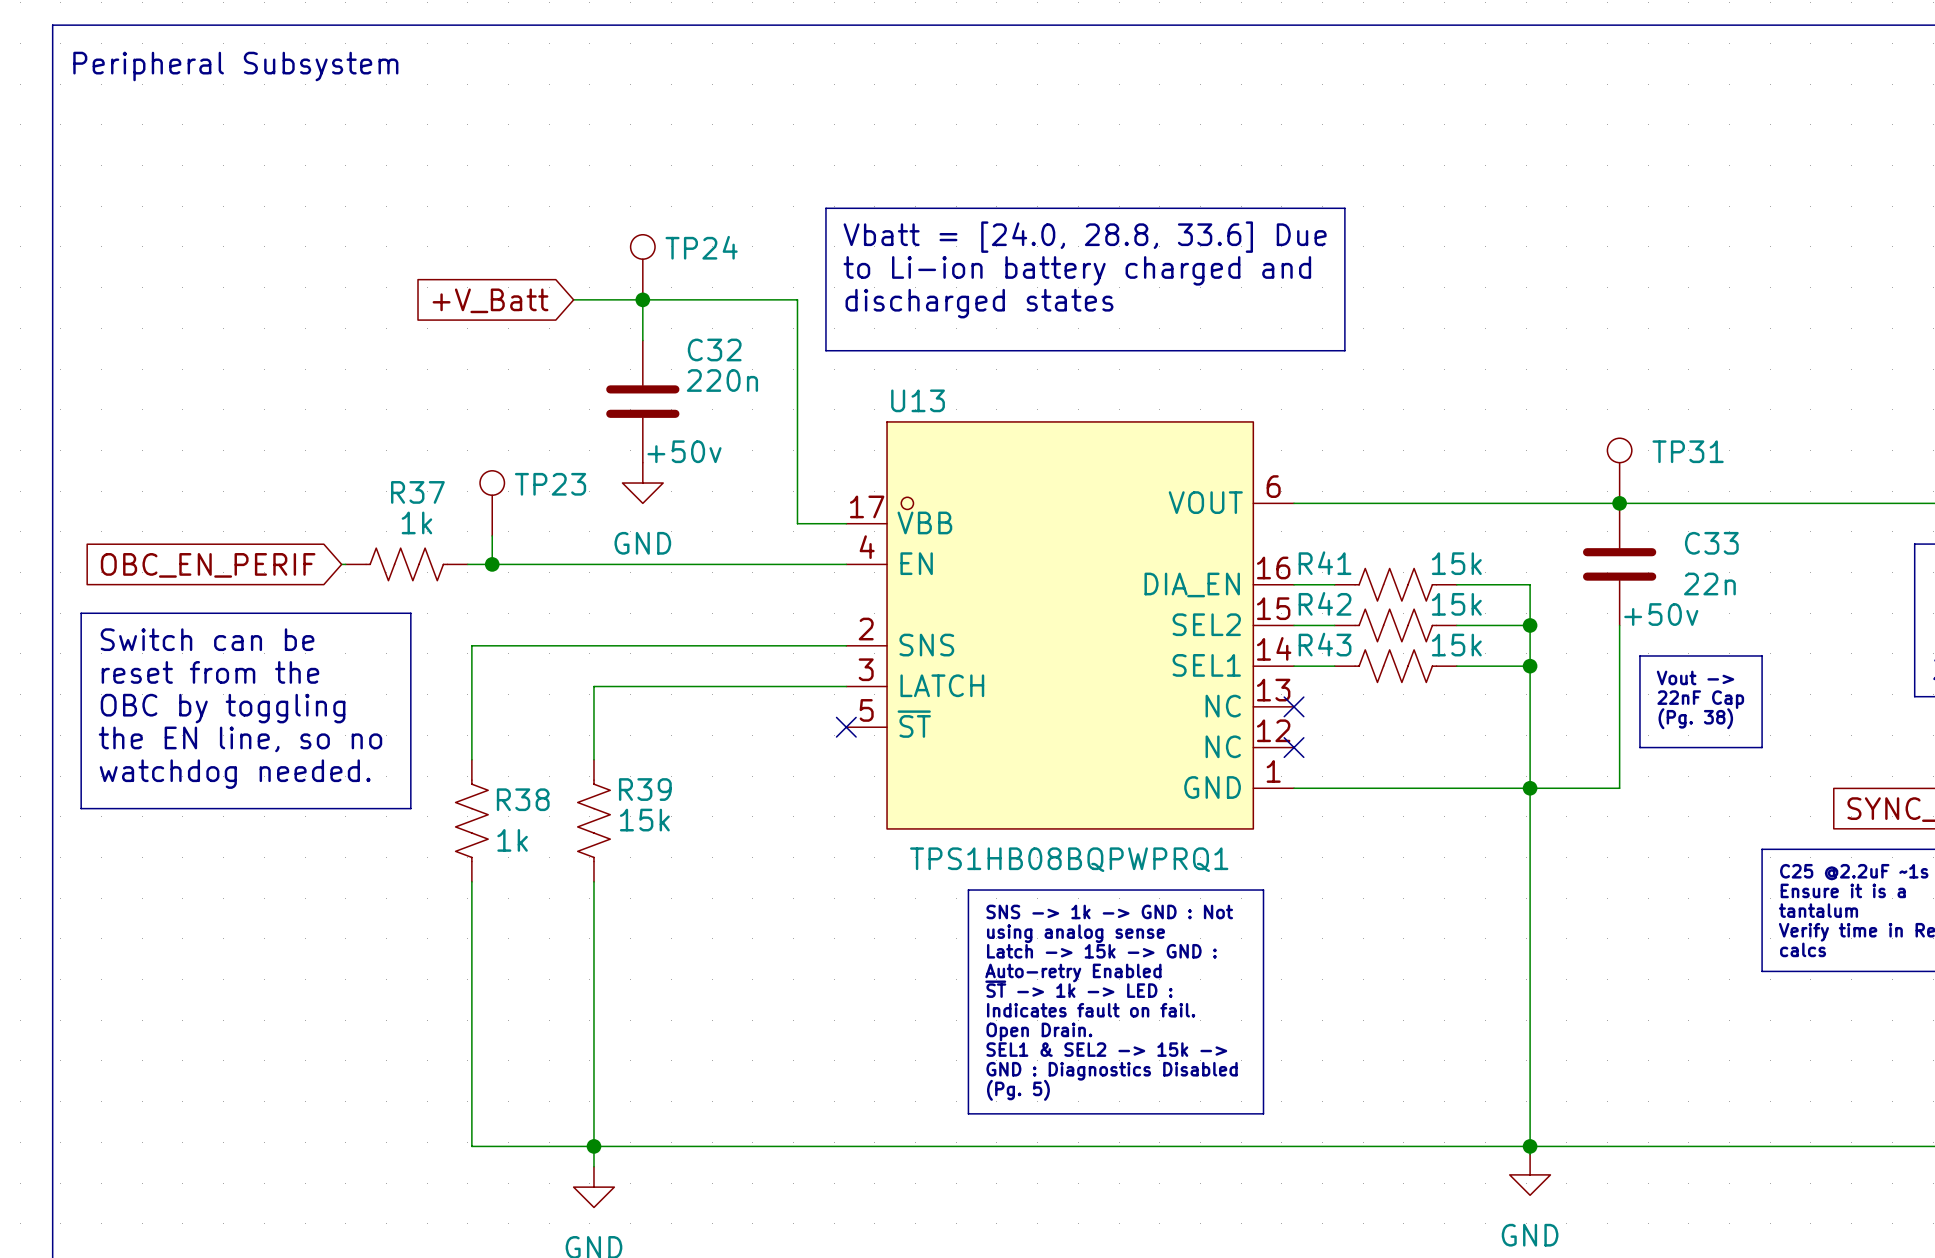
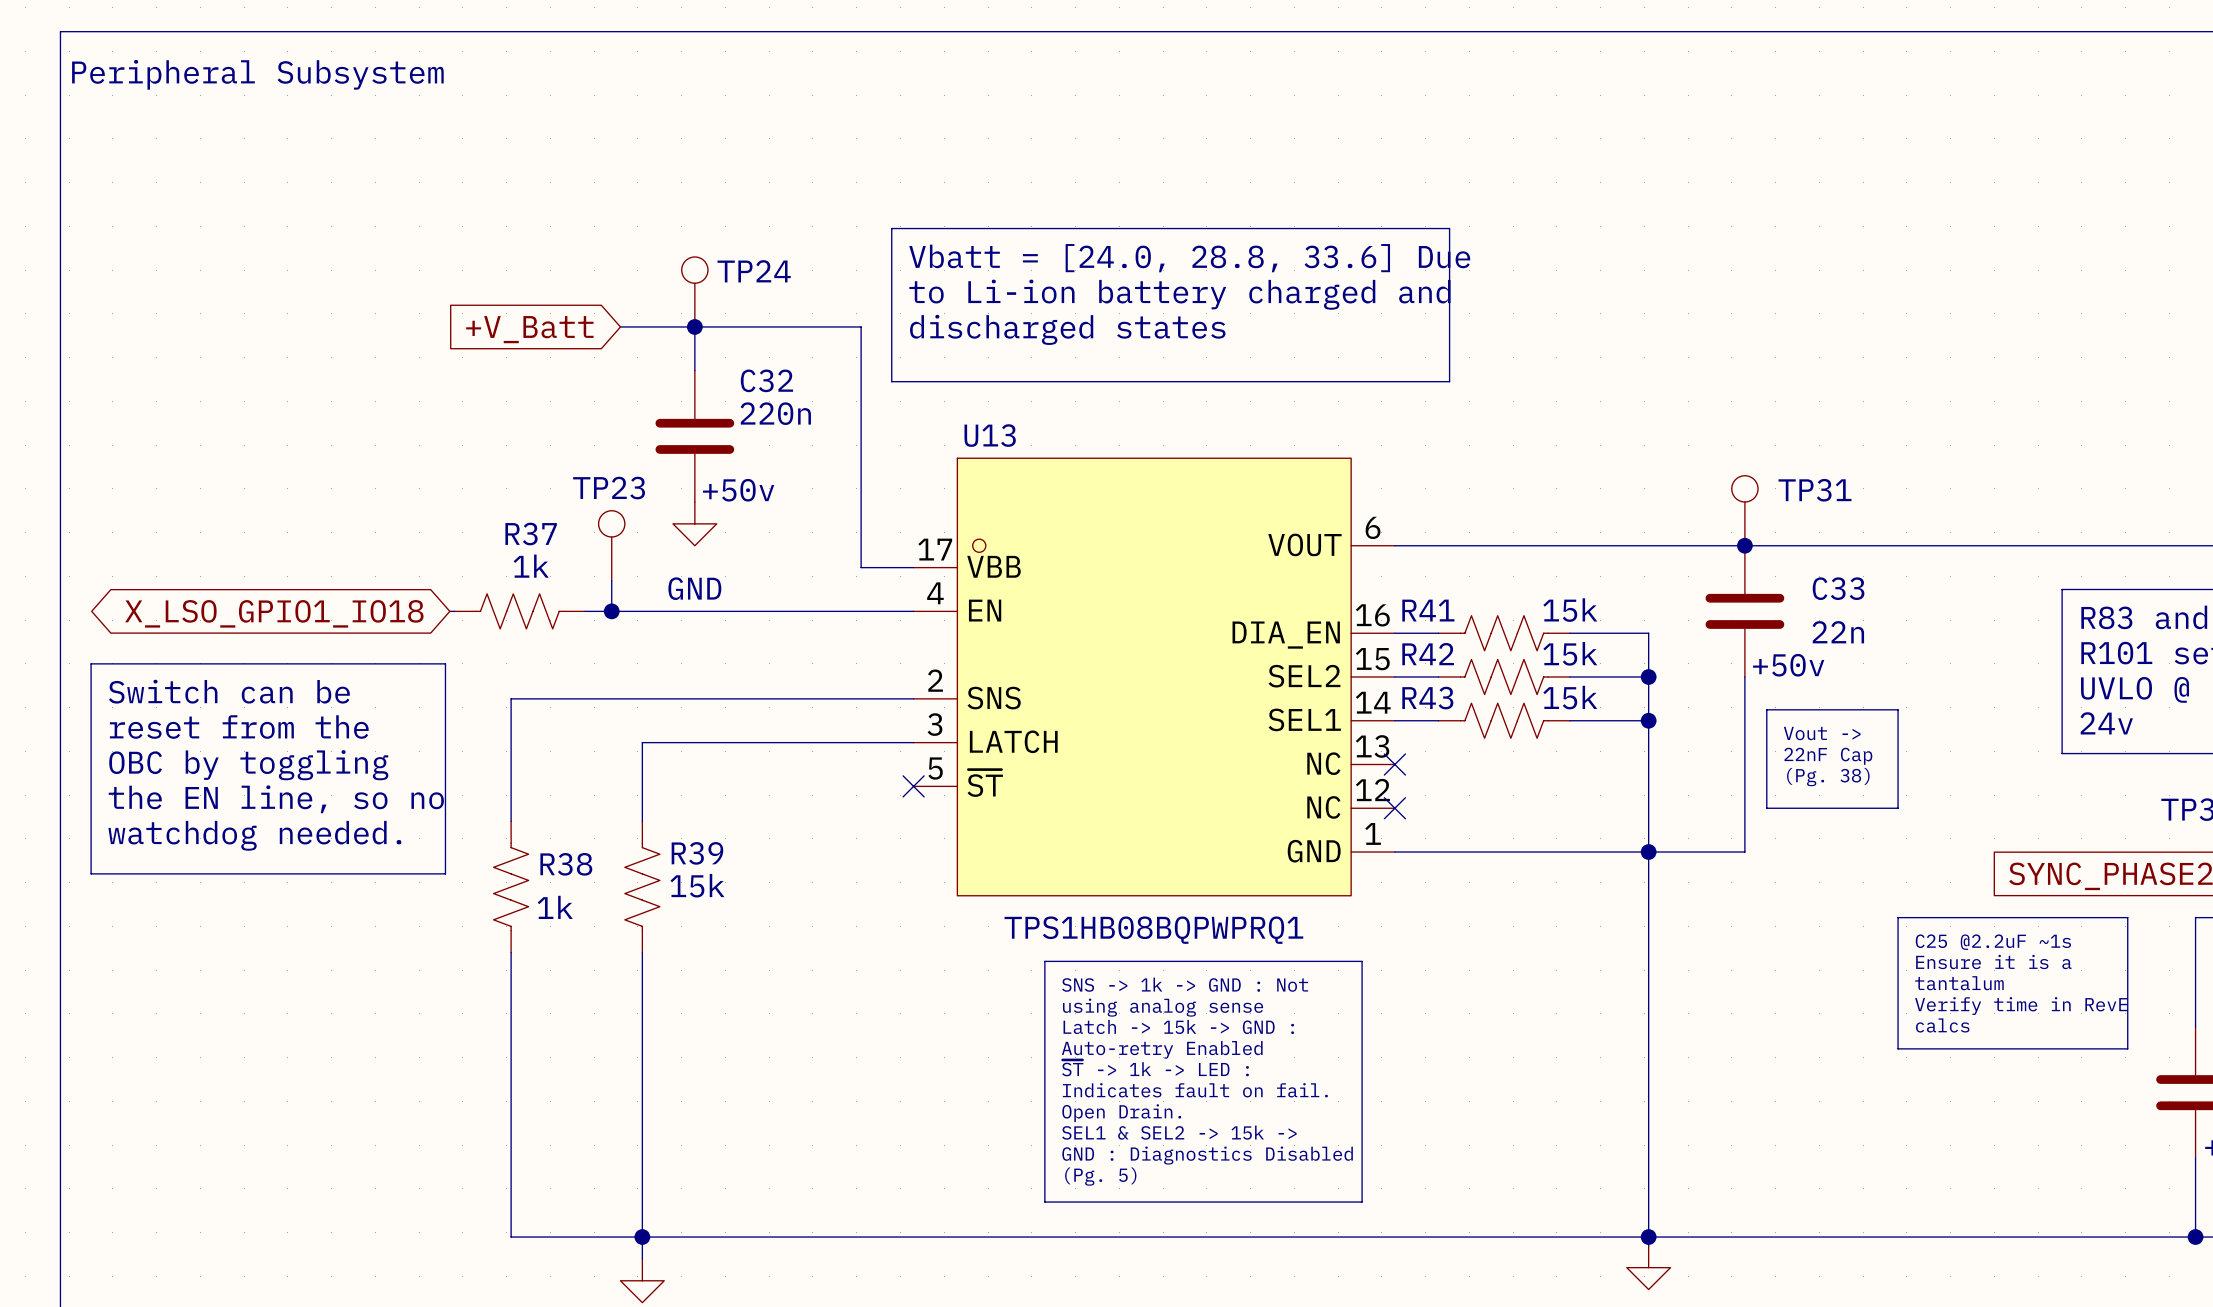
TP23 name position: TP23 (550, 484) -> TP23 (609, 488)
TP23 position: (492, 503) -> (611, 545)
wire: (492, 535) (492, 564) -> (611, 580) (611, 611)
wire: (341, 564) (345, 564) -> (449, 611) (454, 611)
R37 position: (406, 564) -> (519, 611)
wire: (467, 564) (541, 564) -> none
junction position: (492, 564) -> (611, 611)
global label: OBC_EN_PERIF (208, 565) -> none
global label: none -> X_LSO_GPIO1_IO18 (274, 613)

